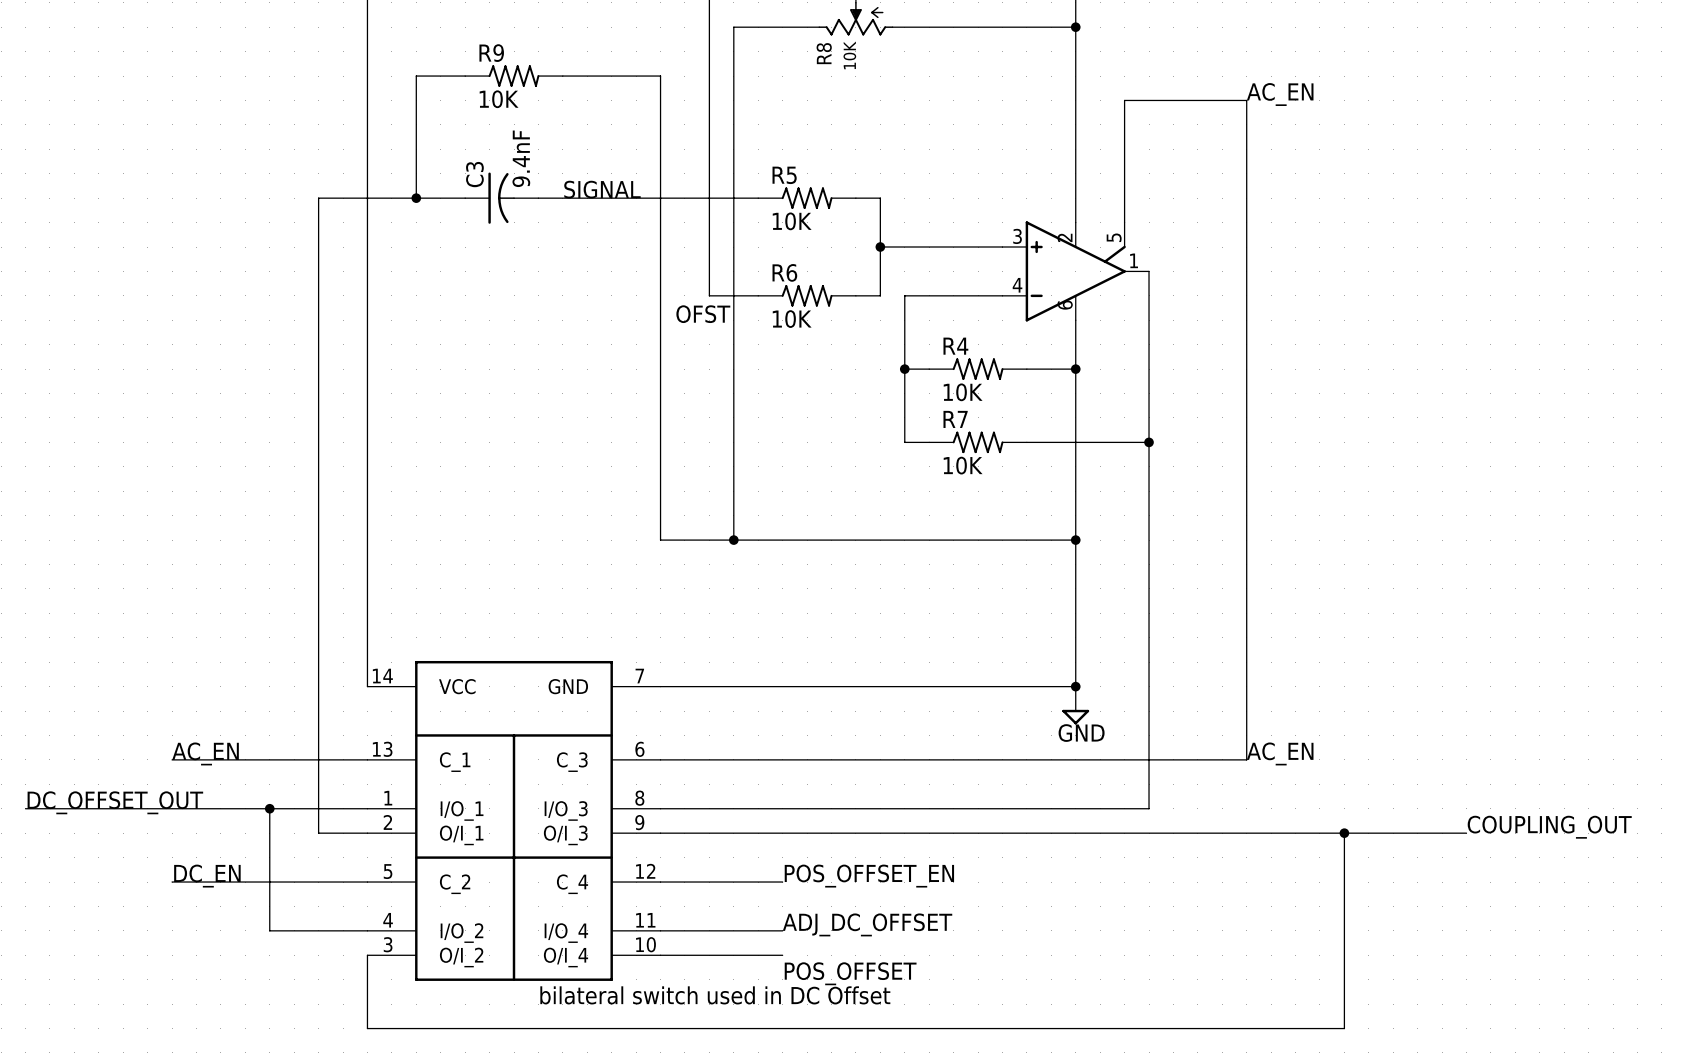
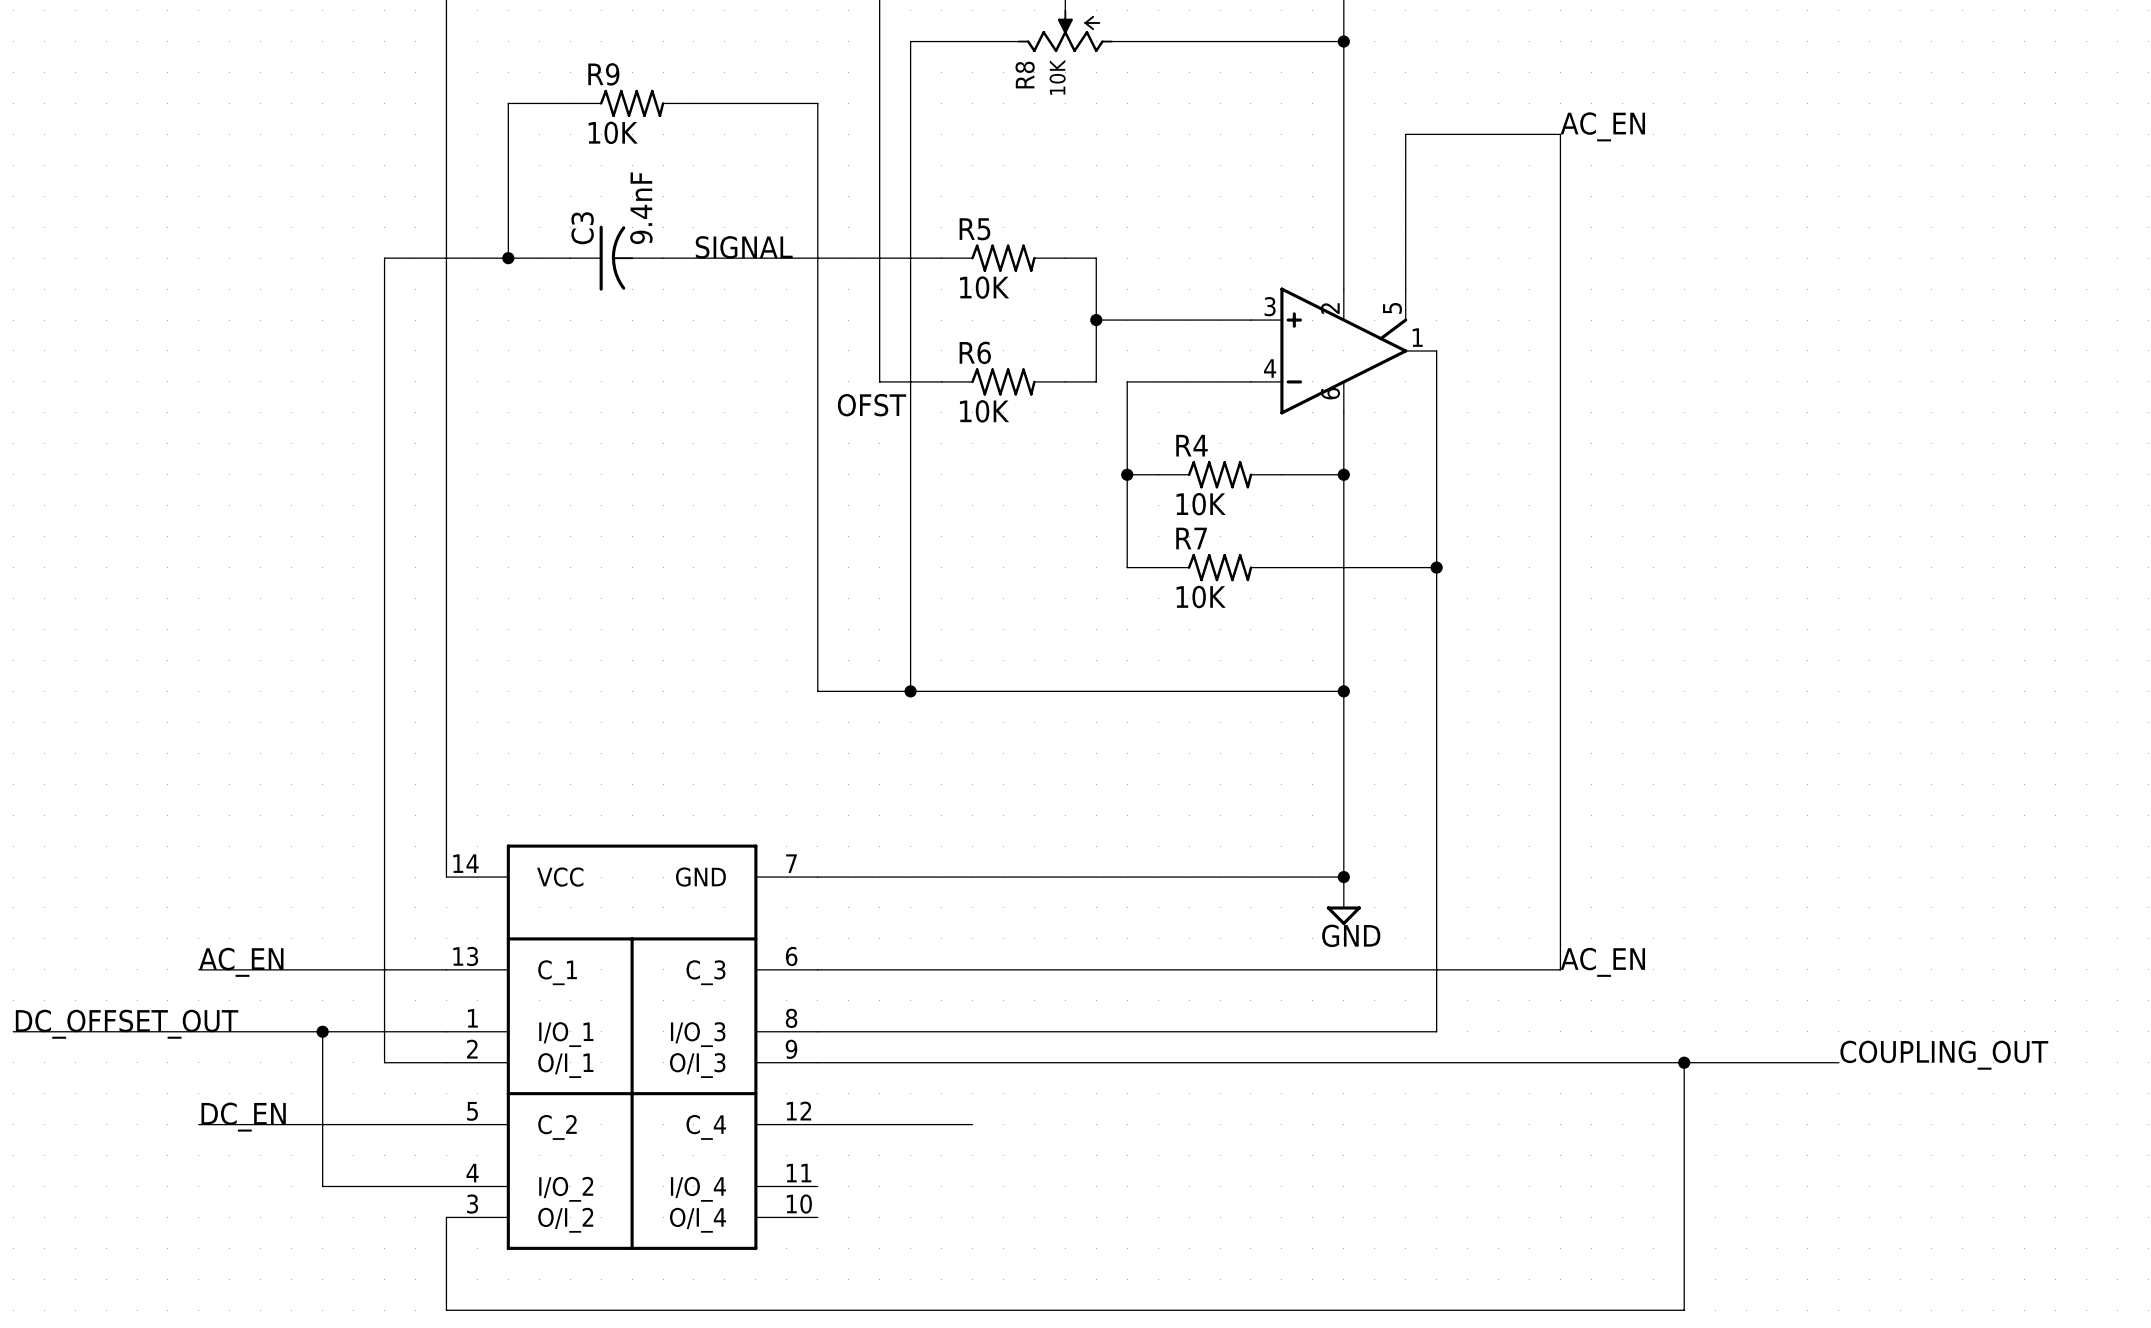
label: POS_OFFSET_EN (869, 876) -> none
label: ADJ_DC_OFFSET (867, 924) -> none
wire: (660, 930) (782, 930) -> none
wire: (660, 955) (782, 955) -> none
label: POS_OFFSET (850, 973) -> none
text: bilateral switch used in DC Offset (715, 995) -> none

